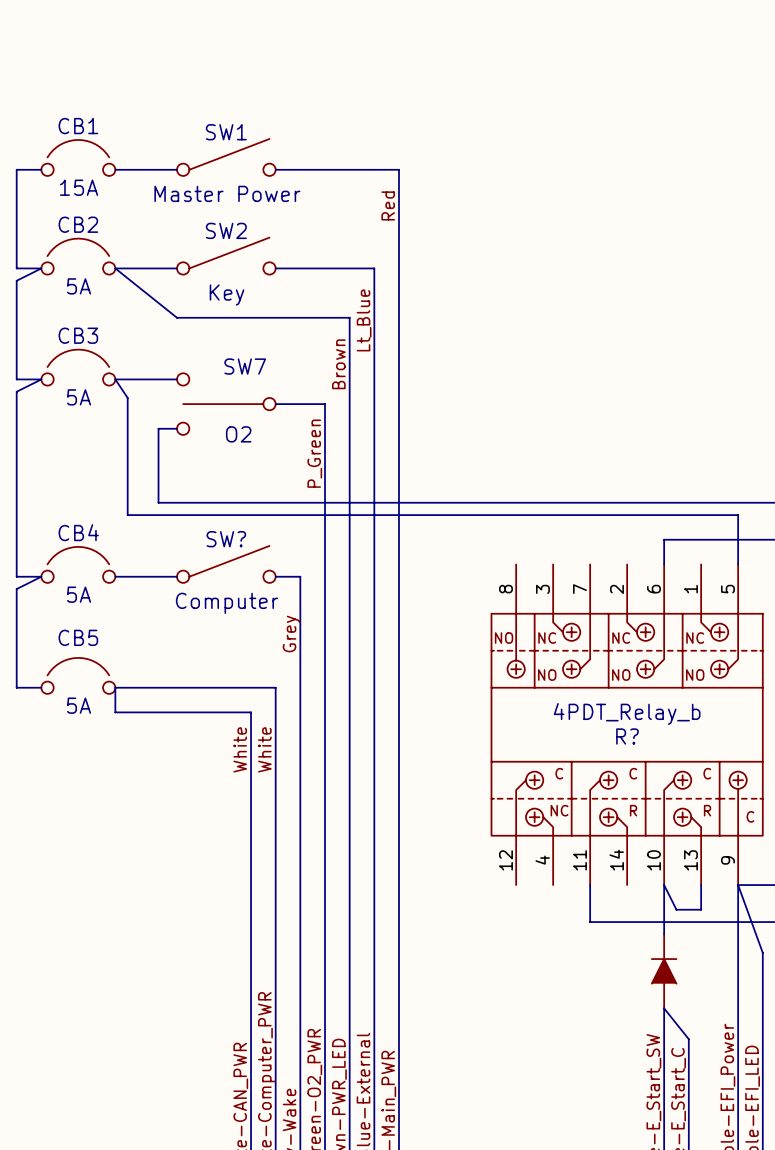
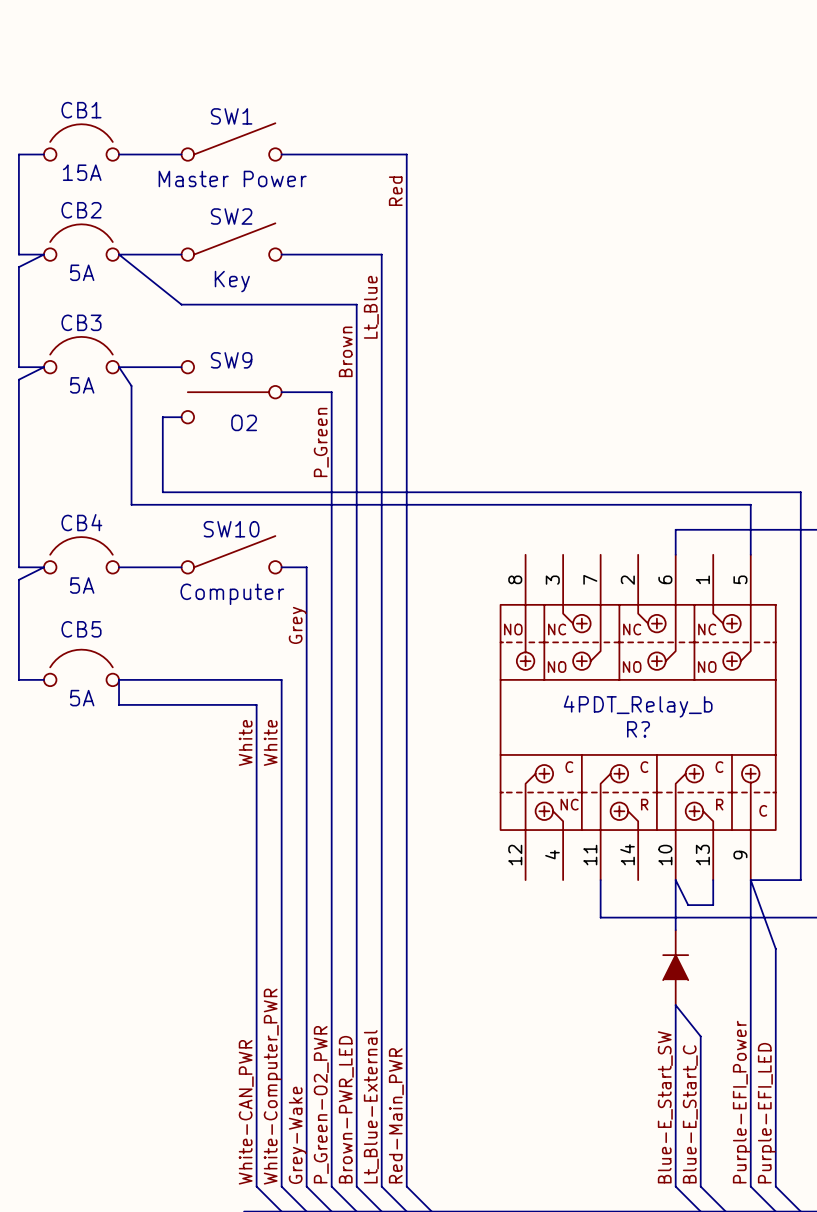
SW7 name: SW7 (245, 366) -> SW9 (231, 360)
SW? name: SW? (226, 539) -> SW10 (231, 529)

